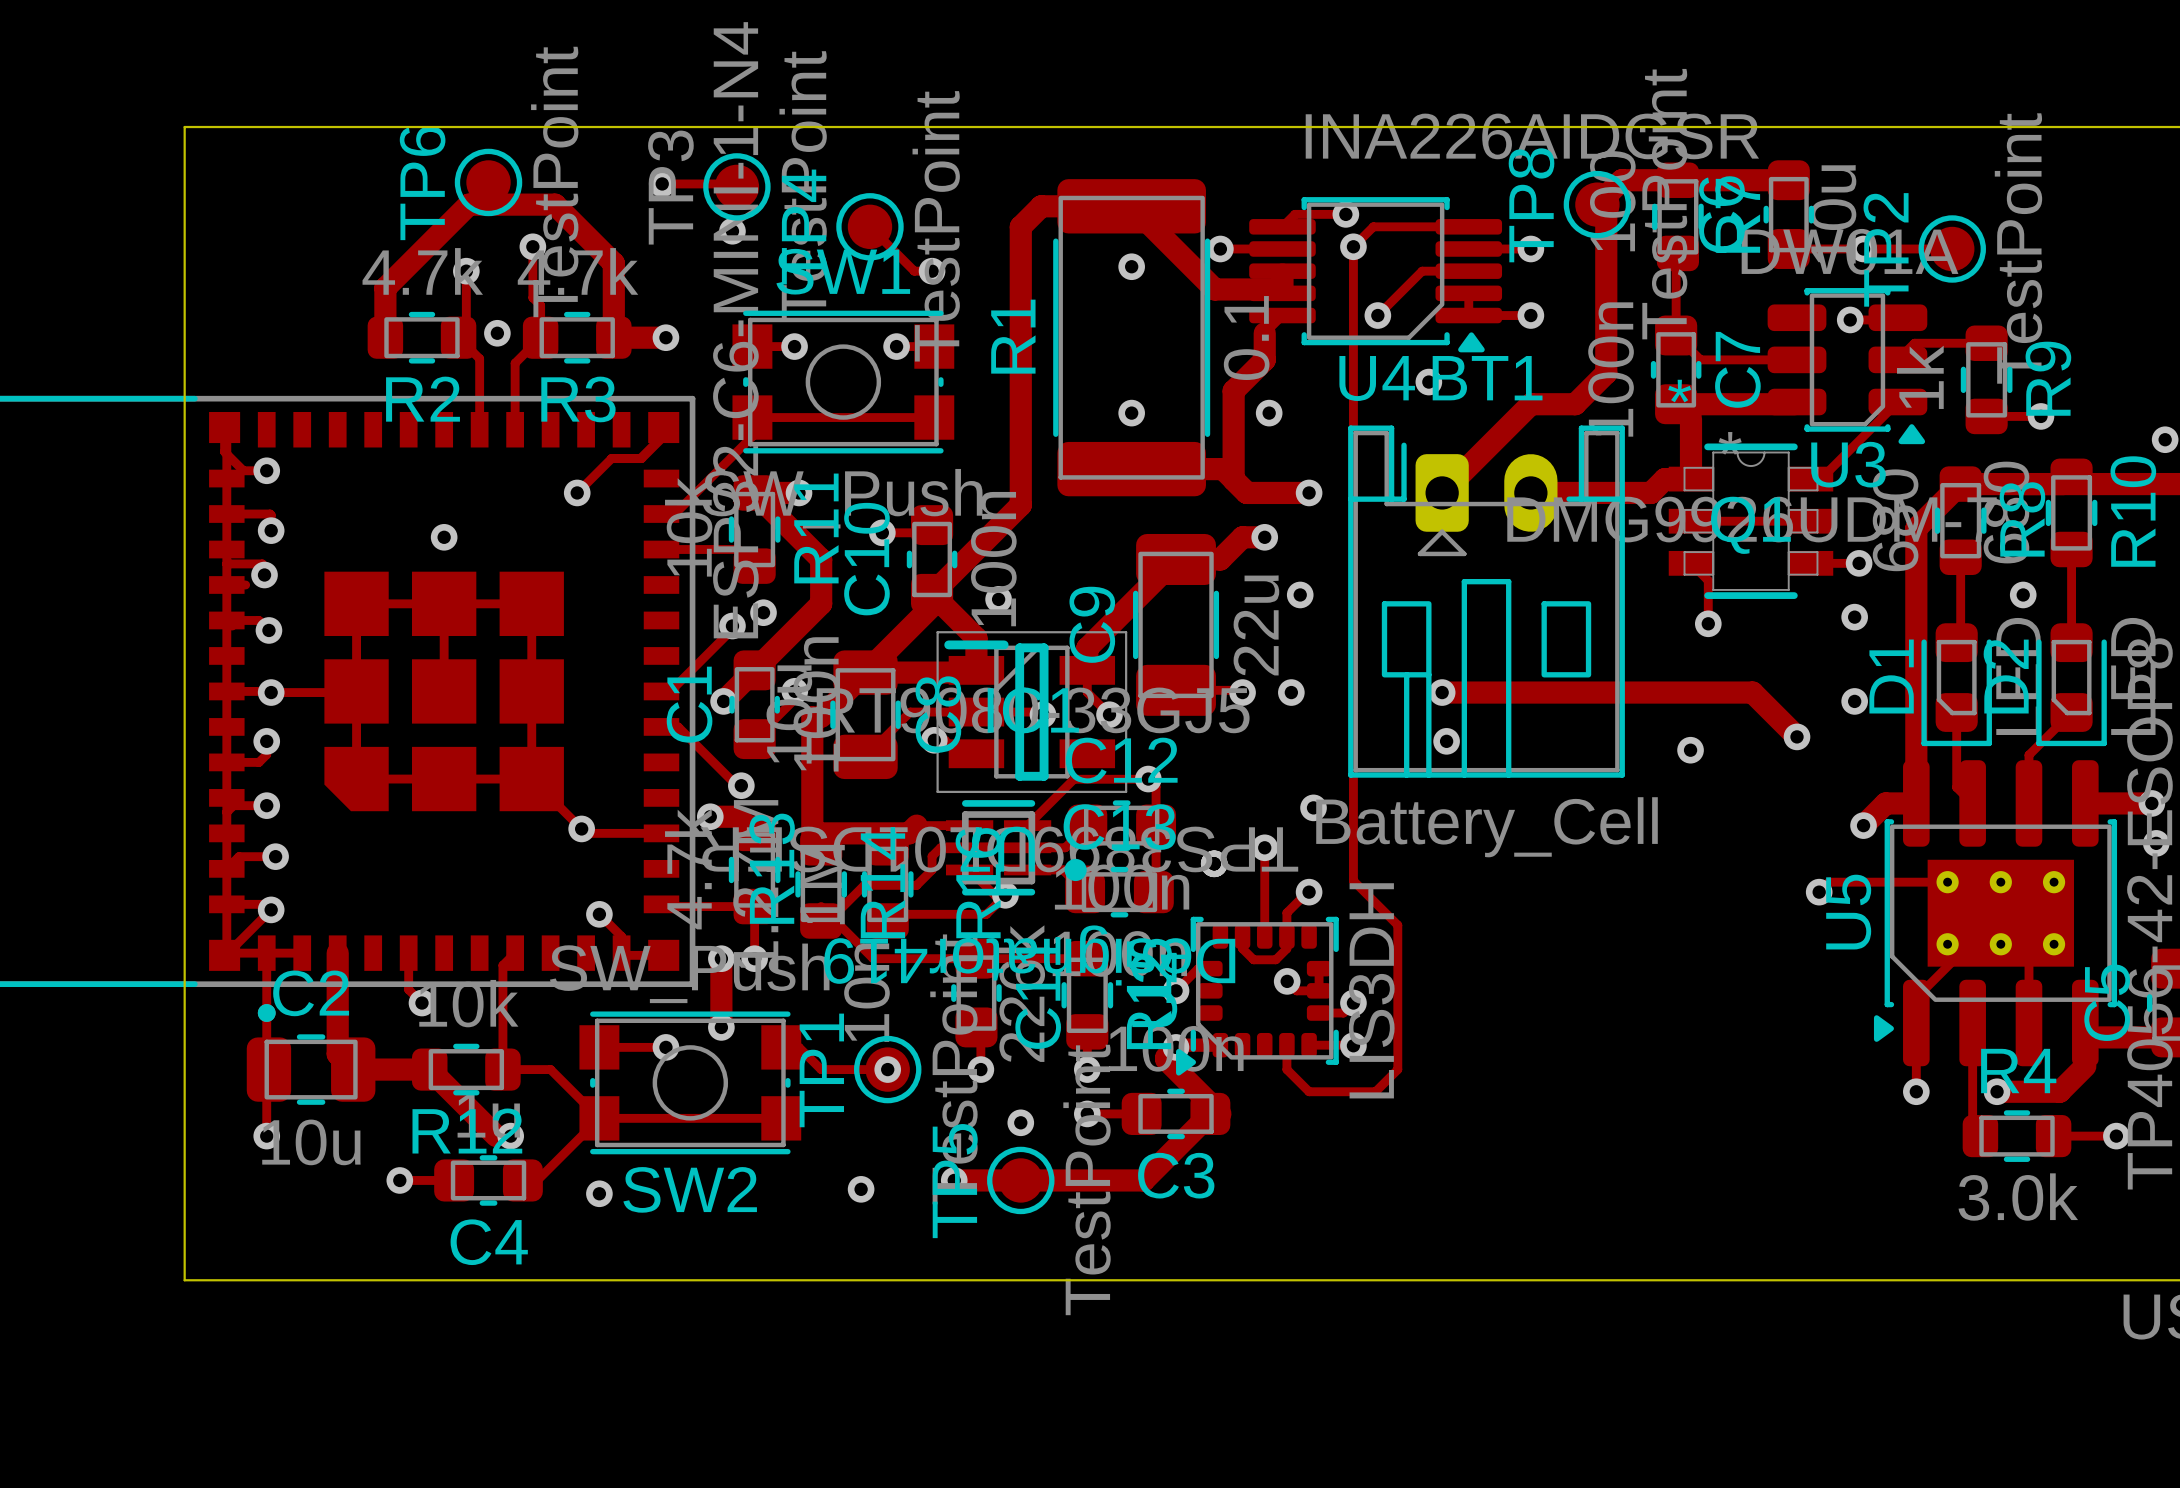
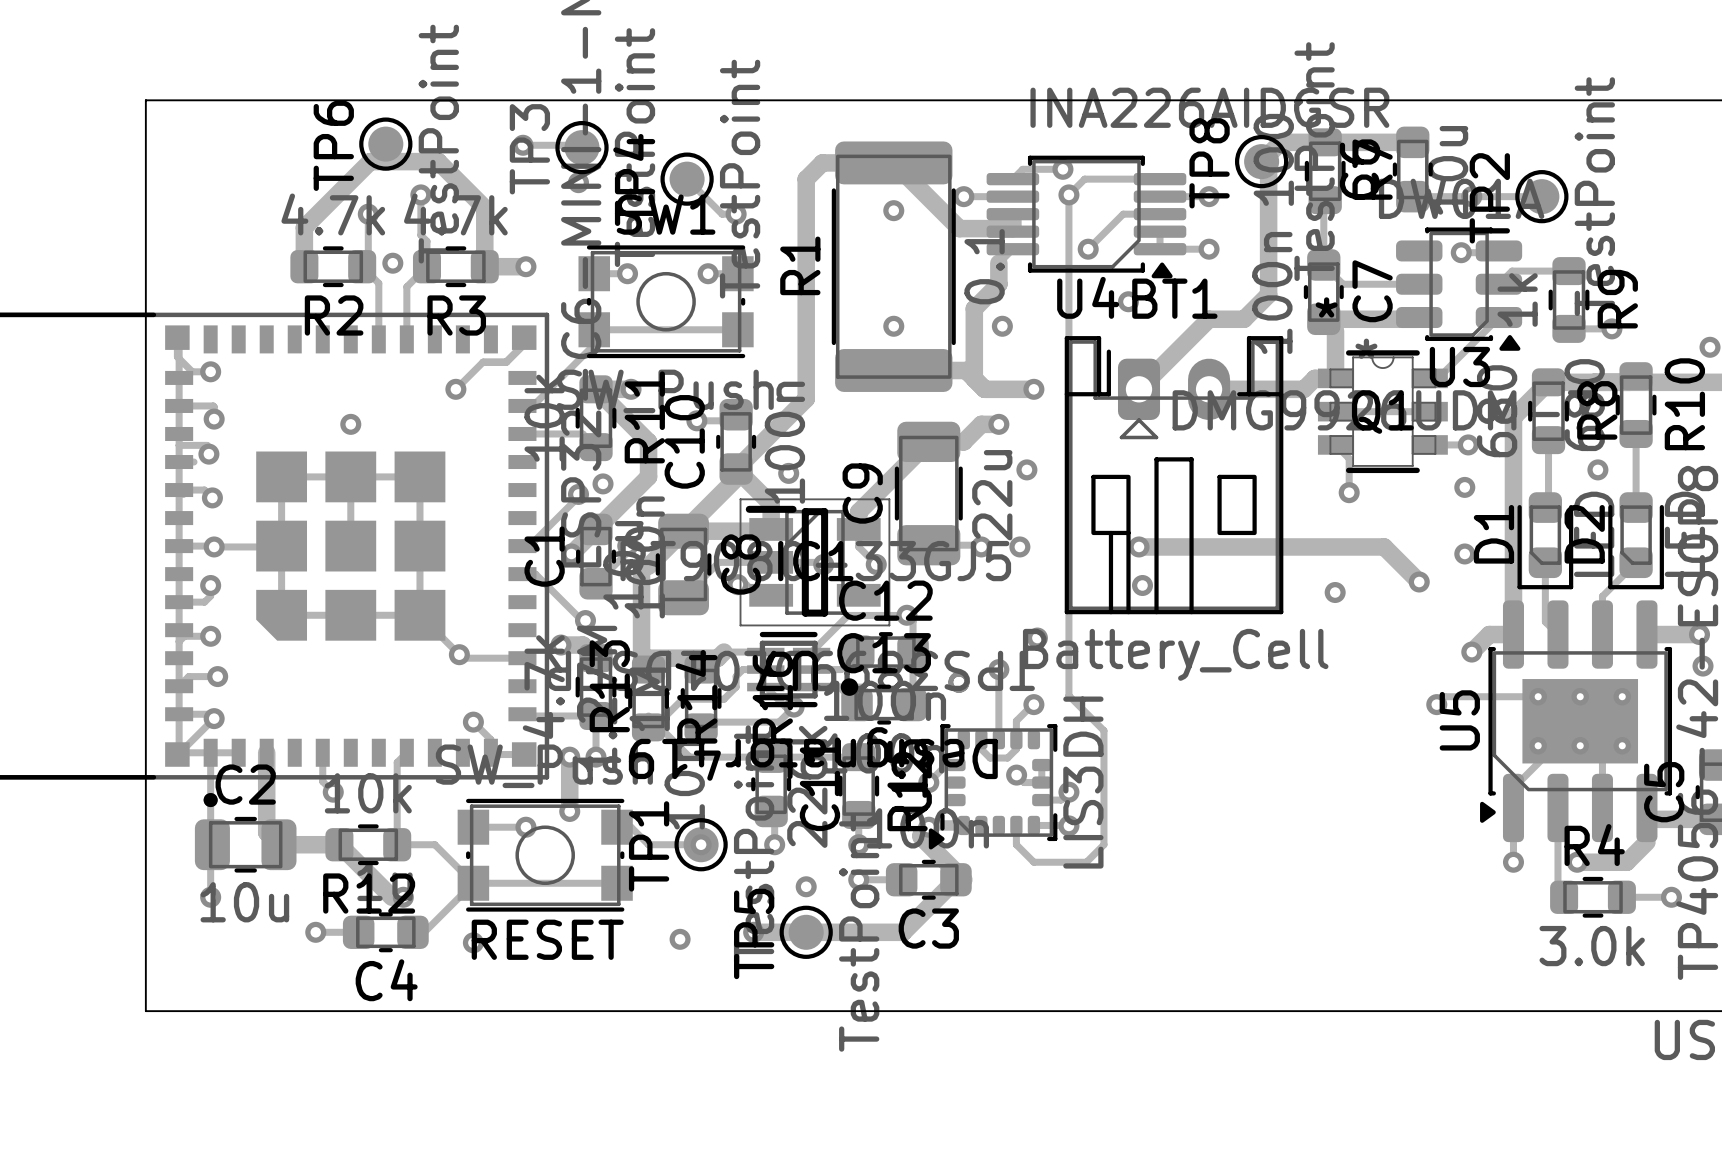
SW2 name: SW2 (690, 1189) -> RESET (547, 939)

